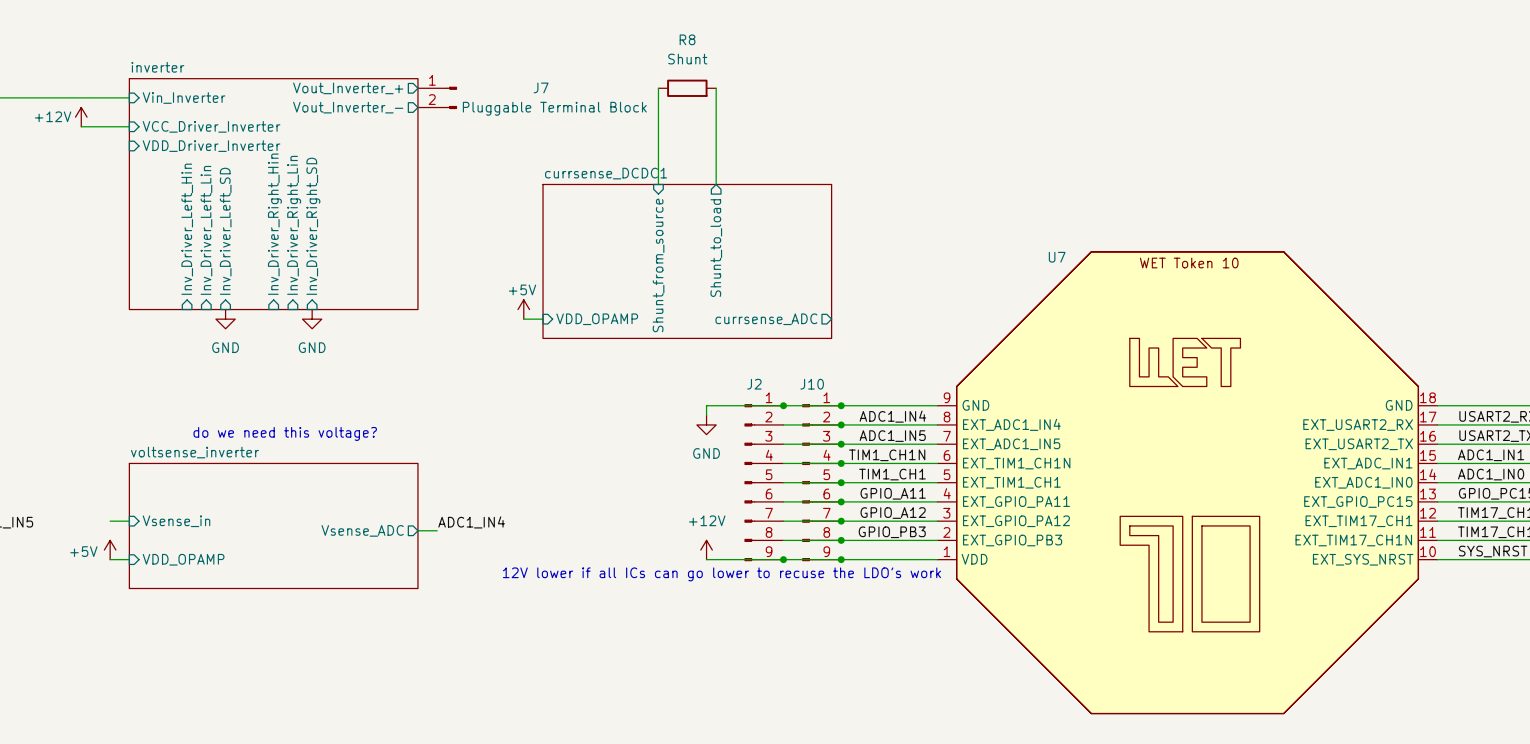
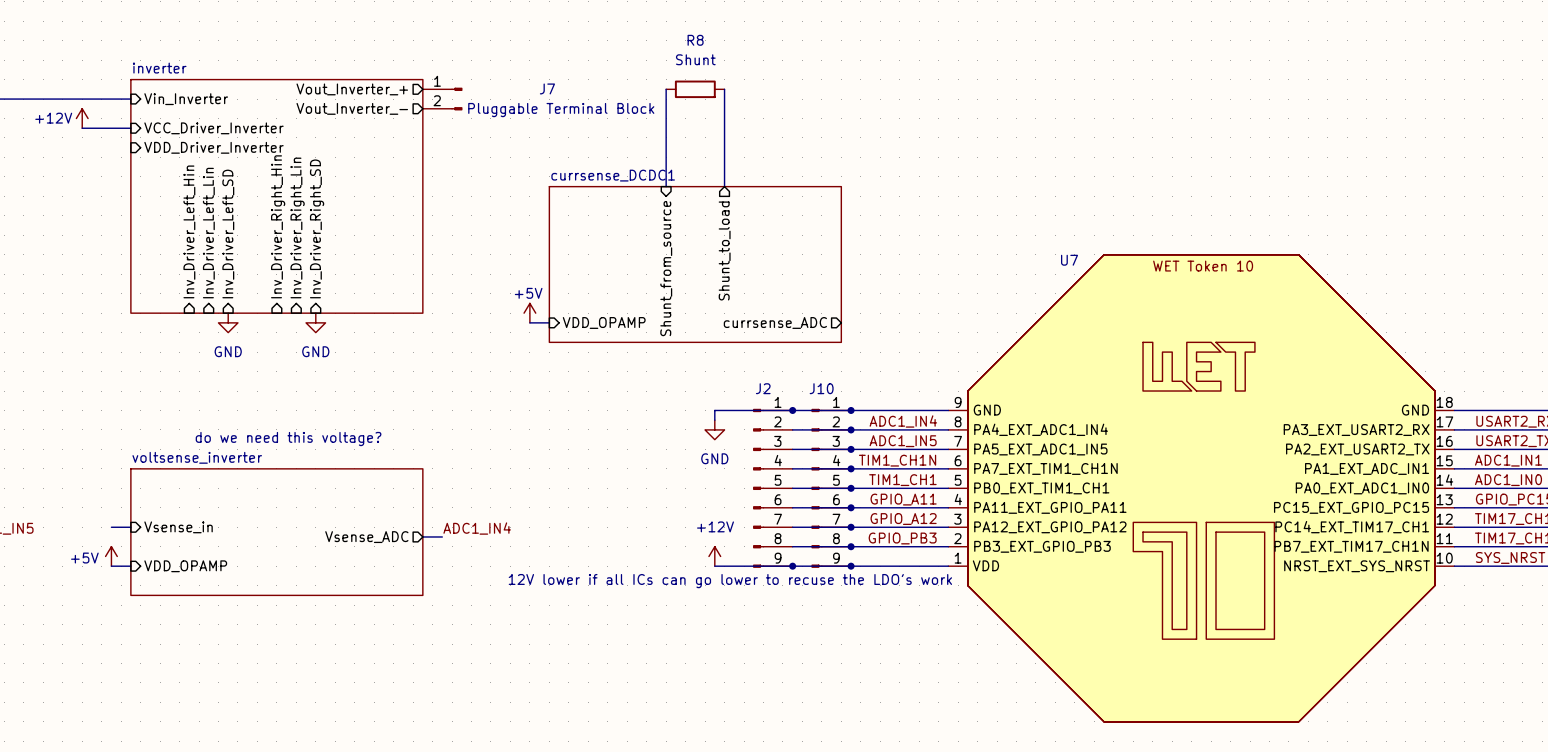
U7 symbol: [937, 251, 1438, 714] -> [948, 254, 1455, 722]

